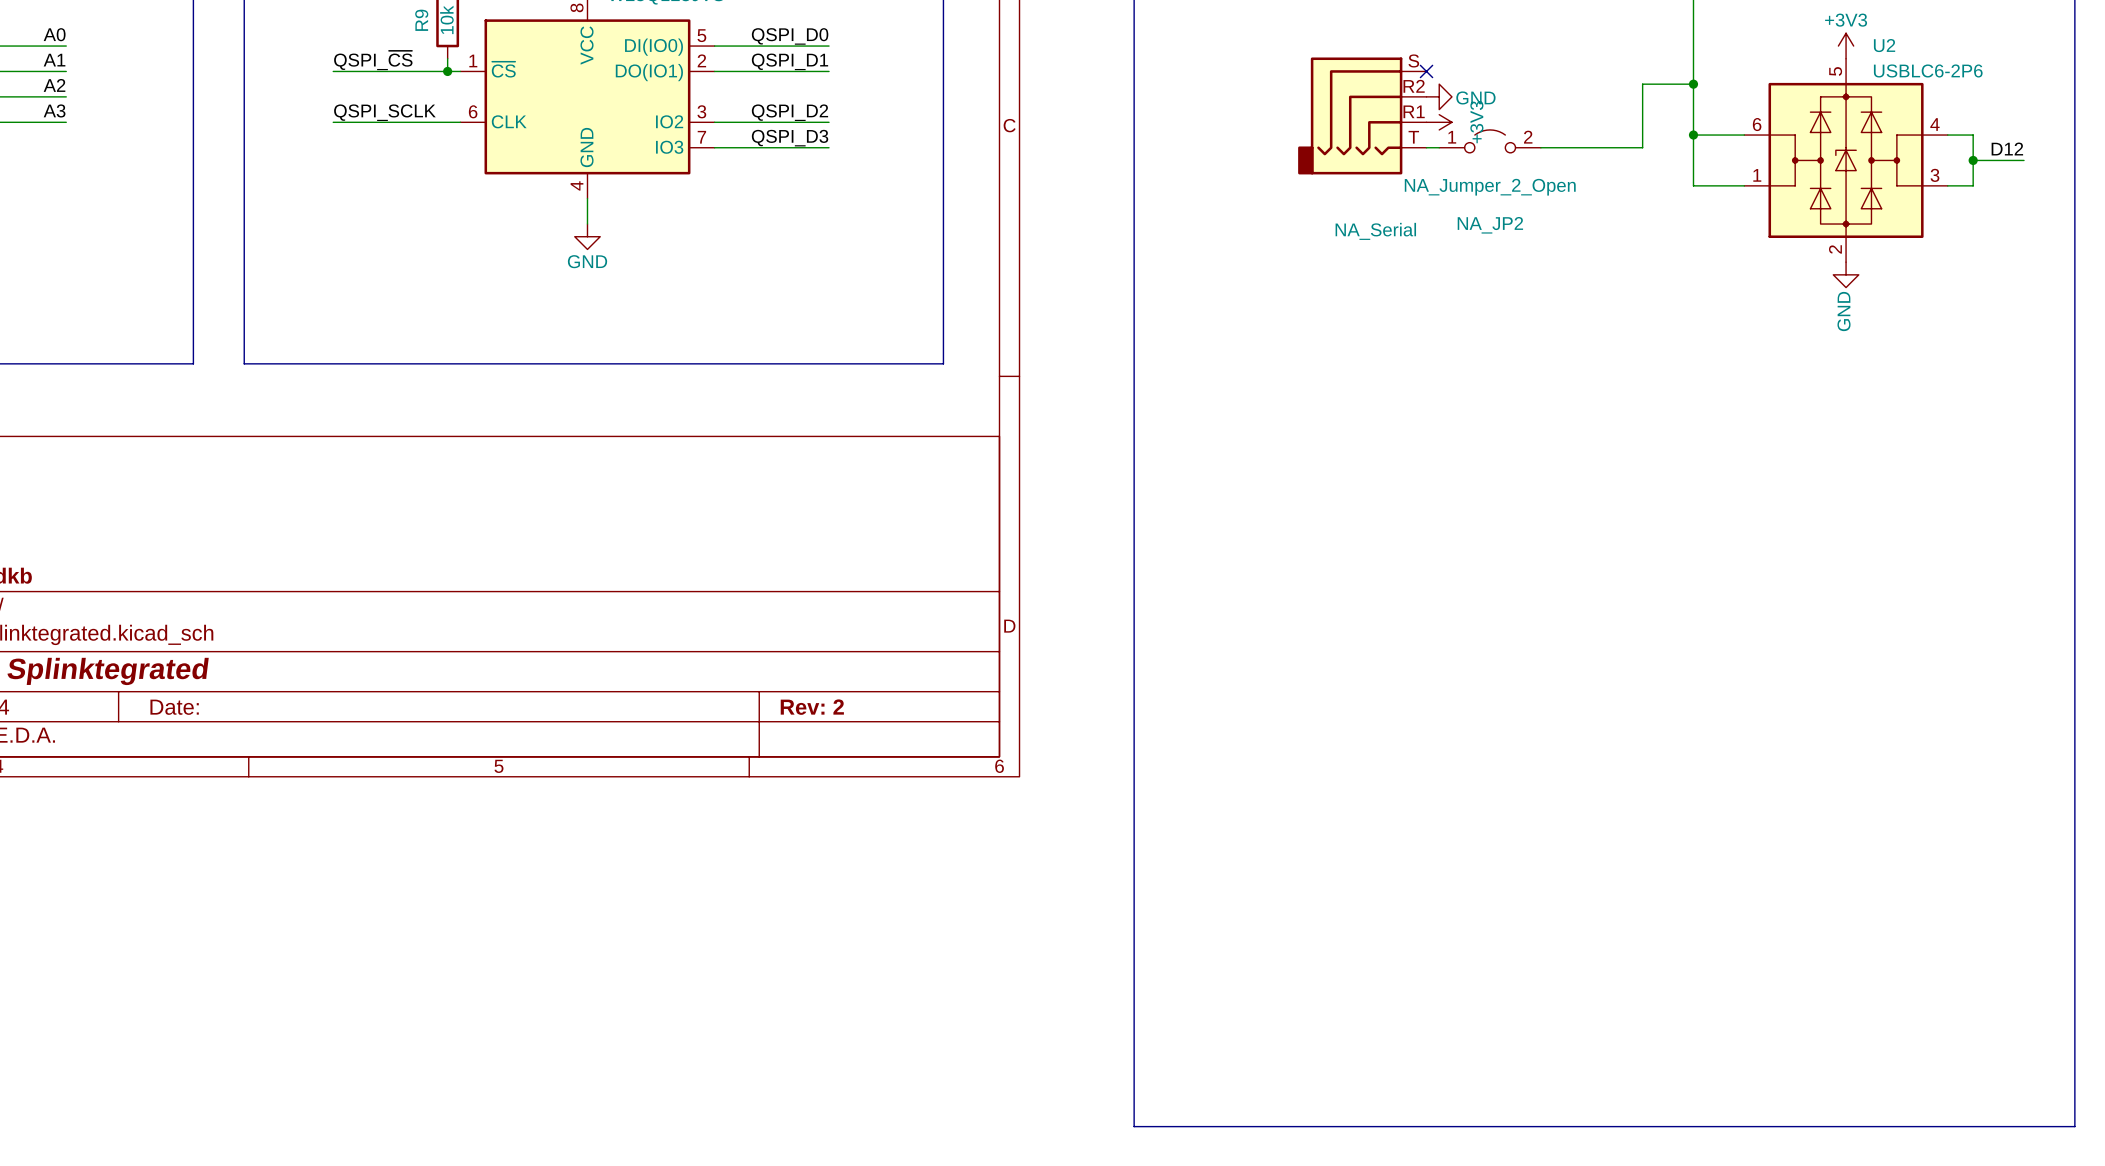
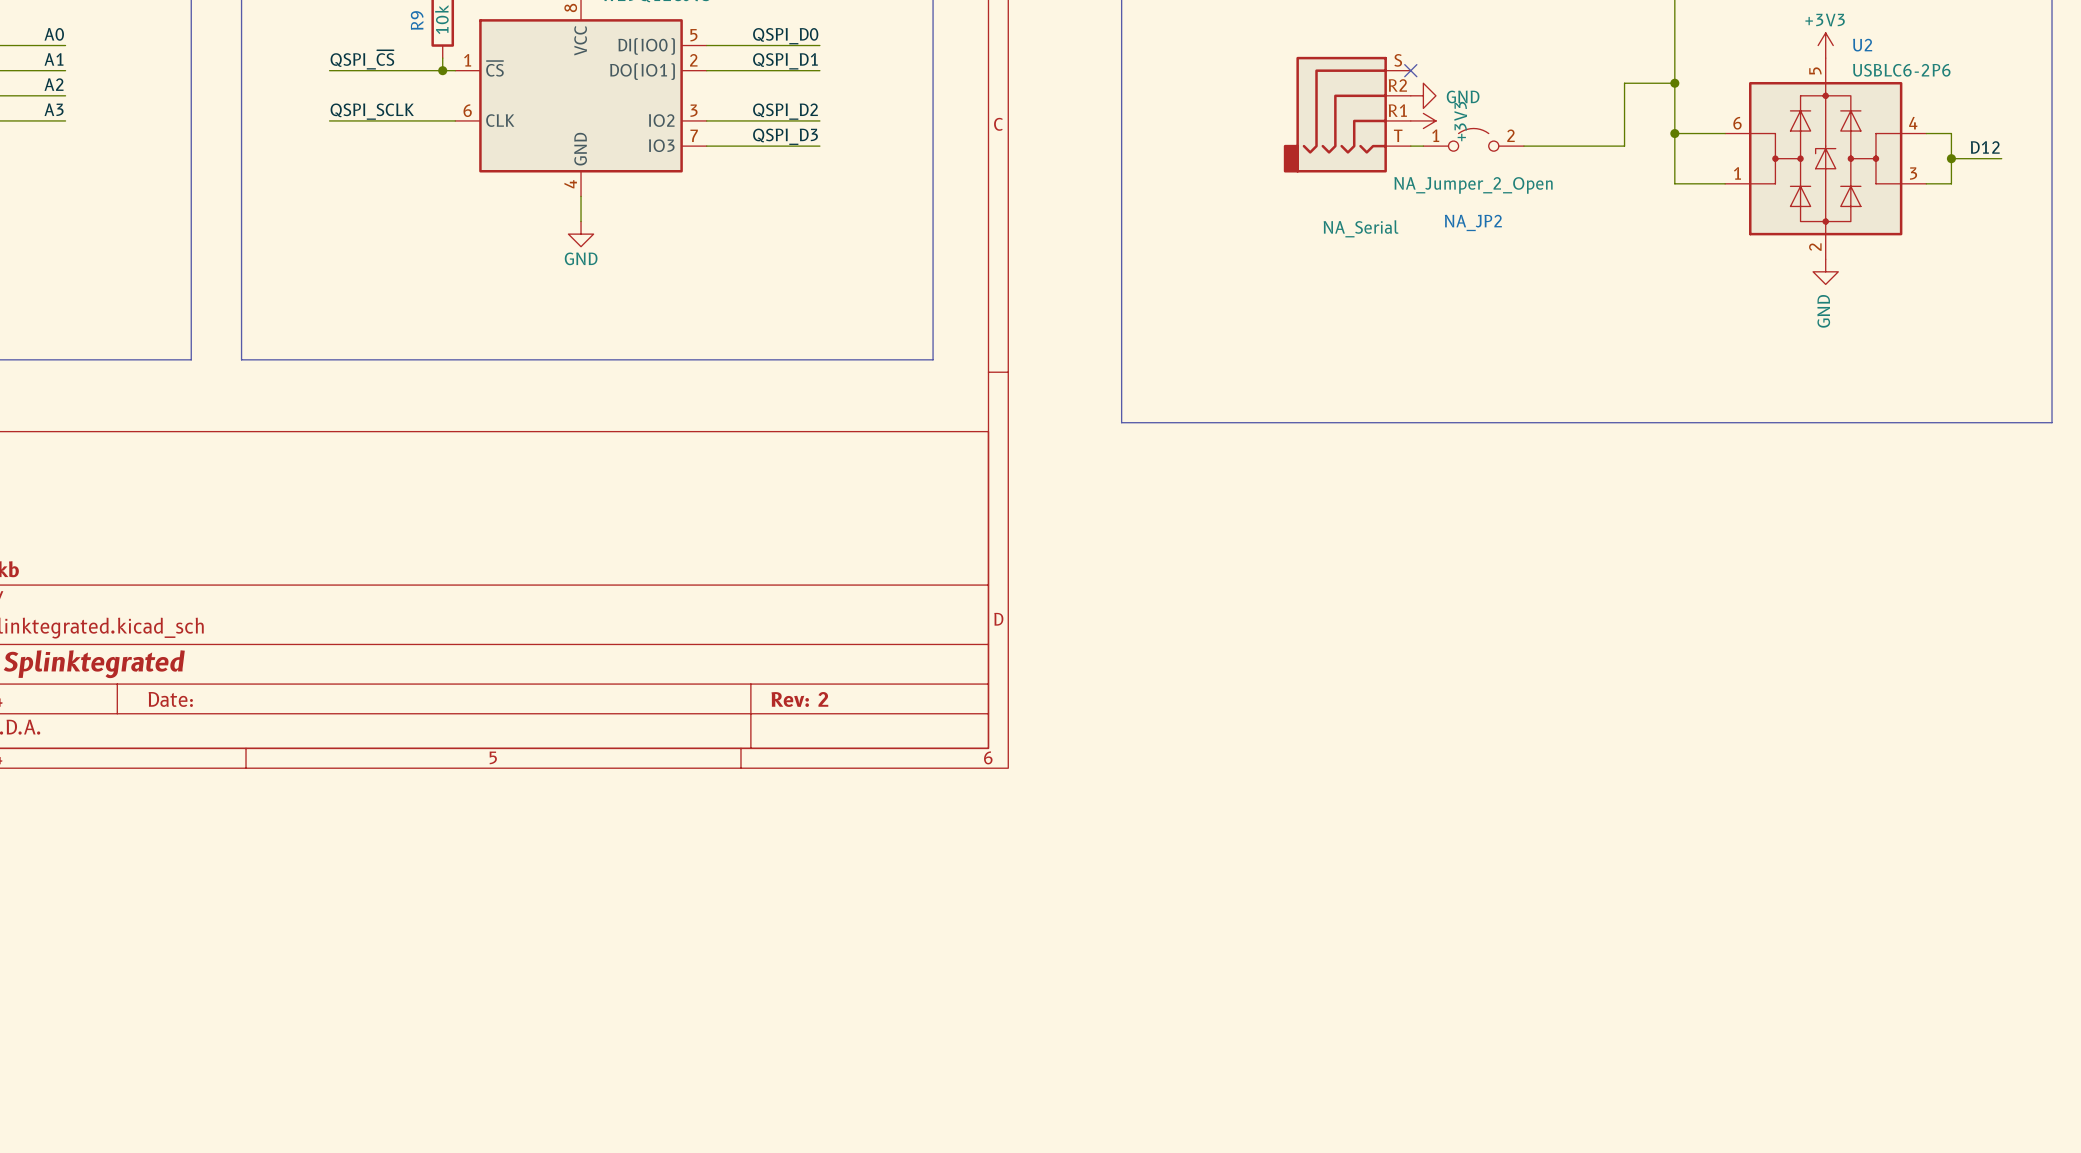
line: (1134, 427) (1134, 1126) (2074, 1126) (2074, 427) -> (1121, 422) (2052, 422)

